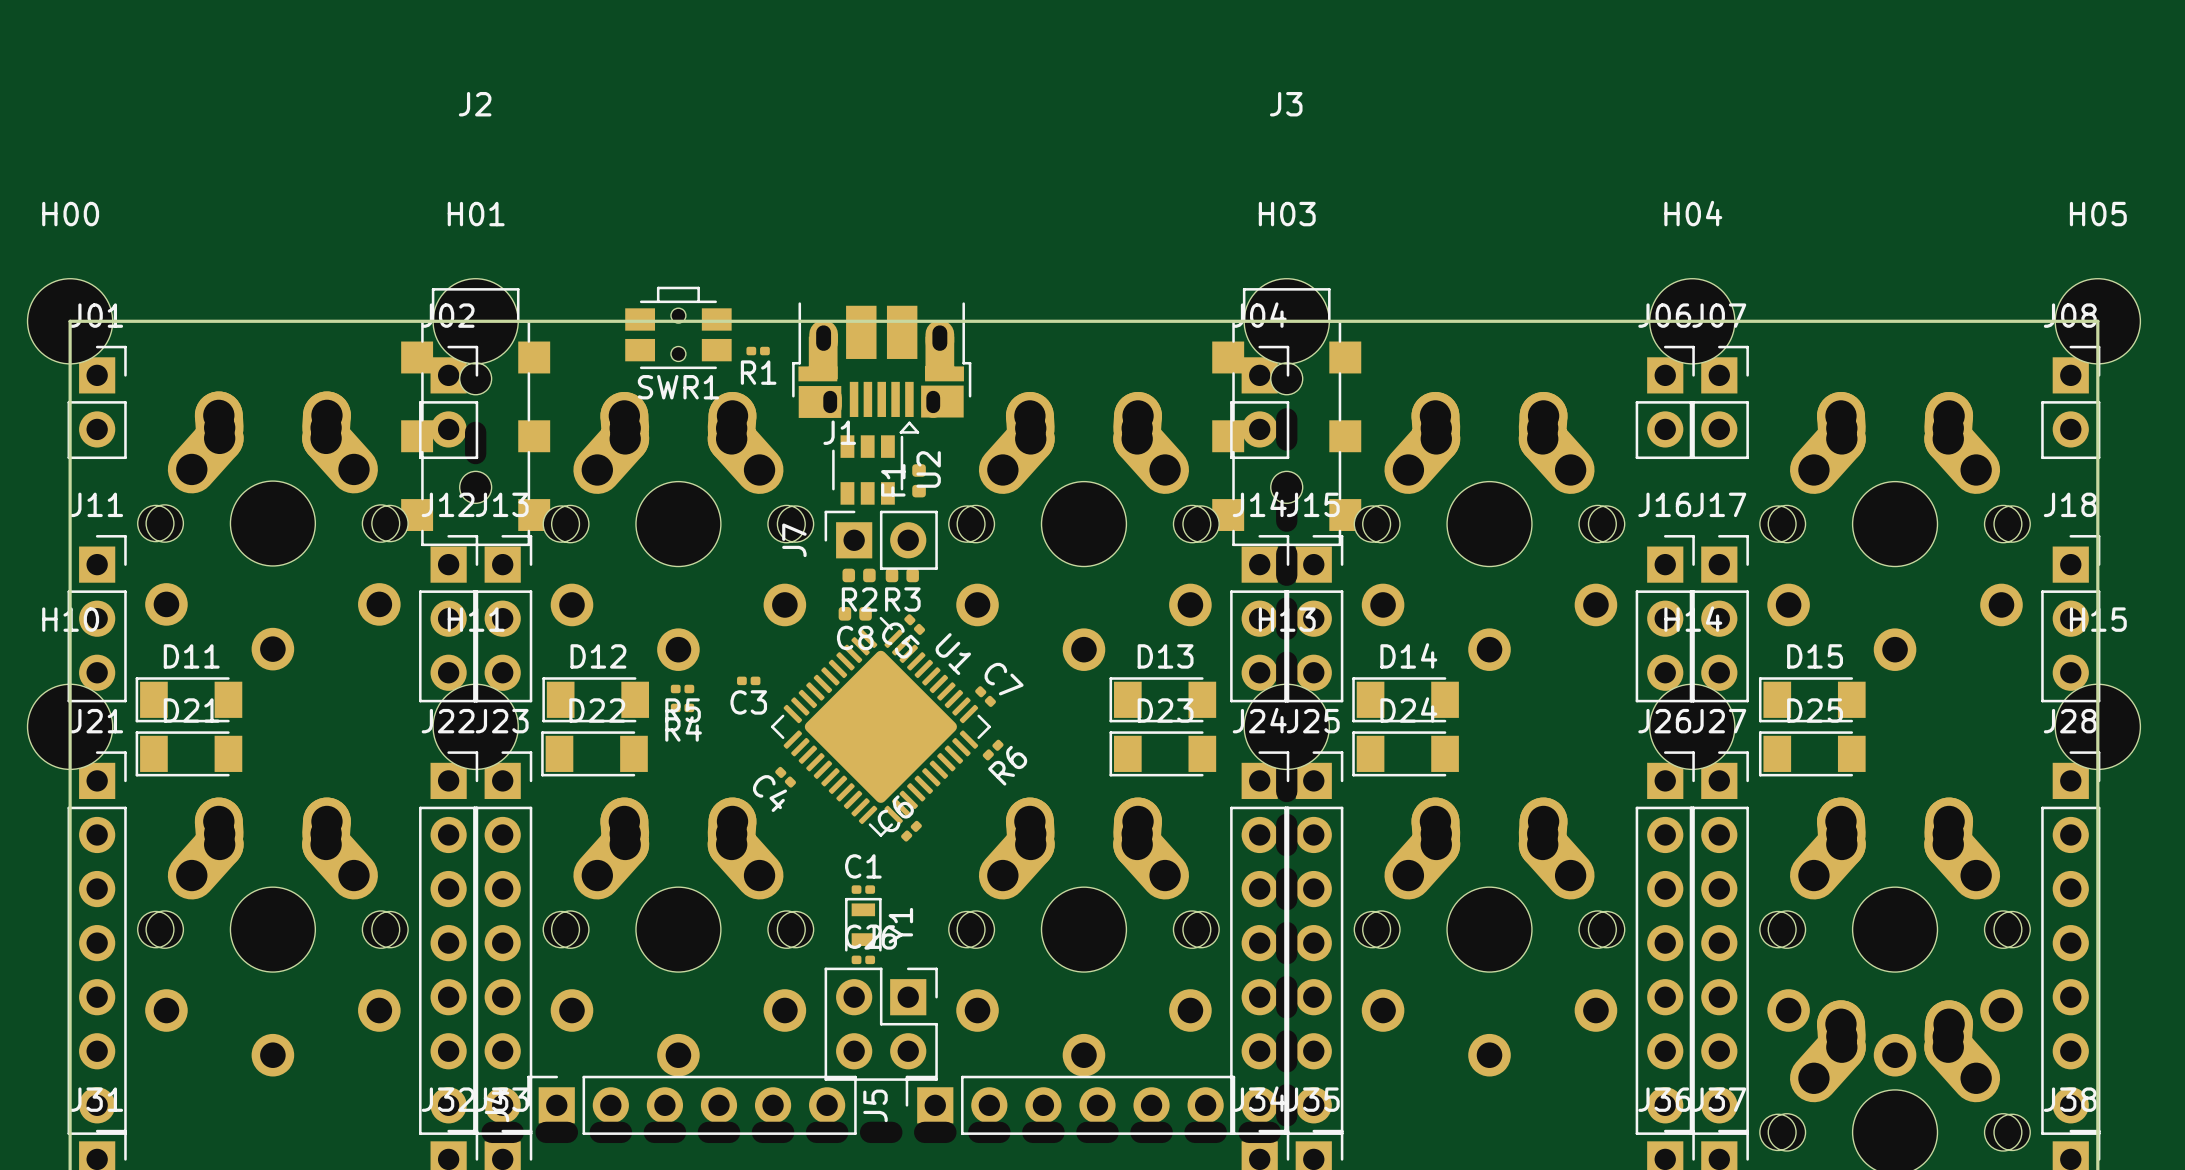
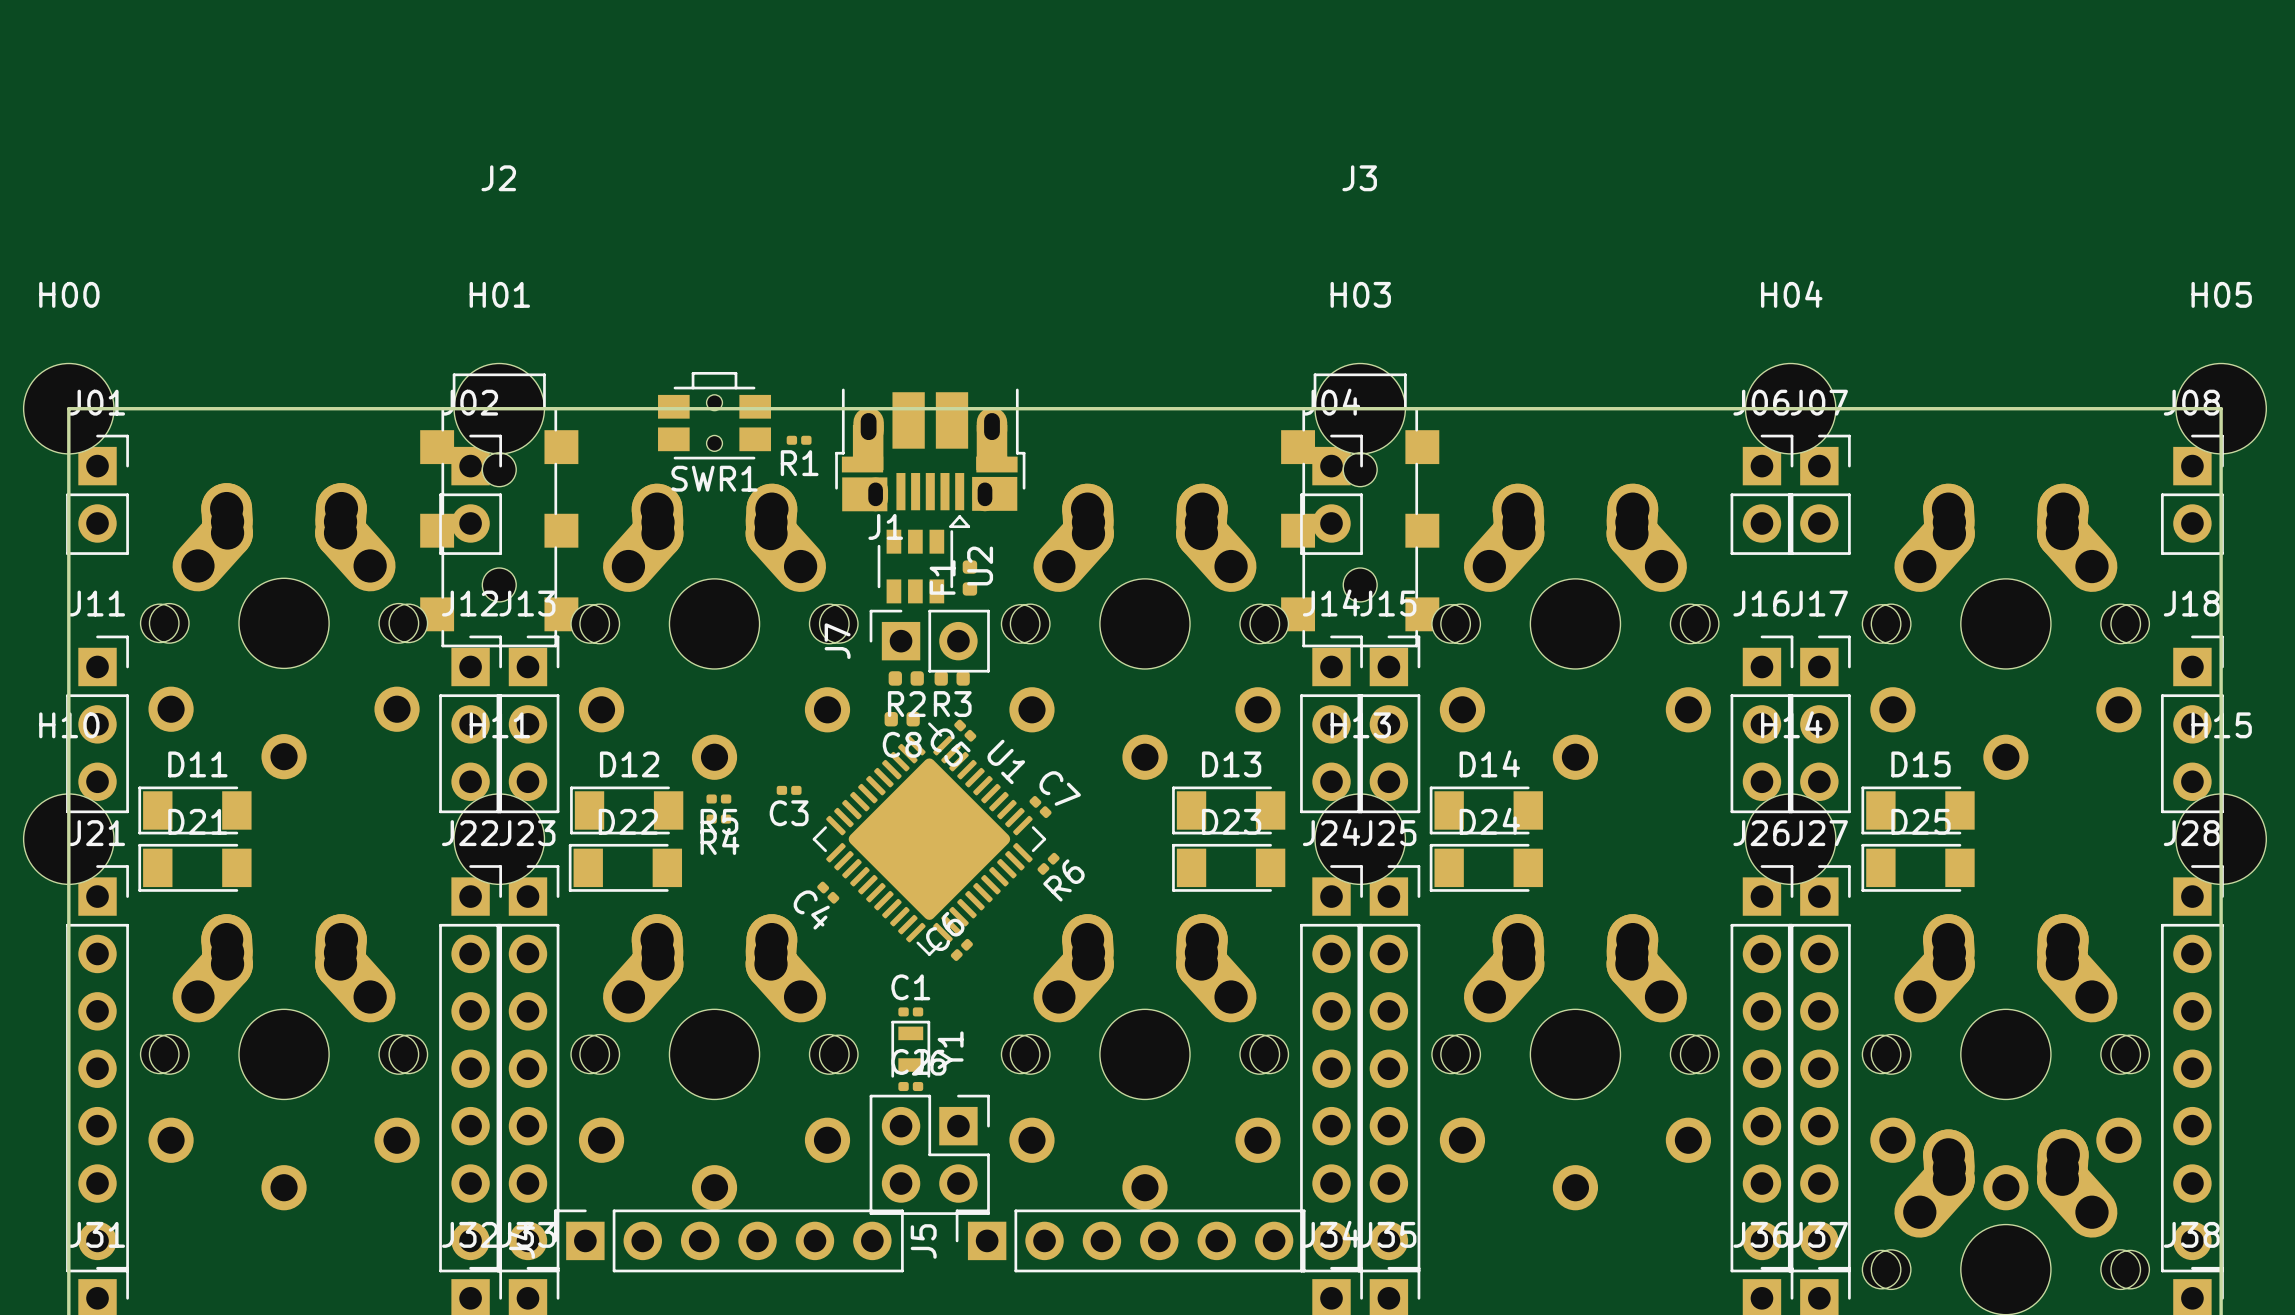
part: (1286, 429) -> none
part: (475, 442) -> none
part: (1286, 591) -> none
part: (1286, 943) -> none
part: (664, 1132) -> none
part: (881, 1132) -> none
part: (1097, 1132) -> none

